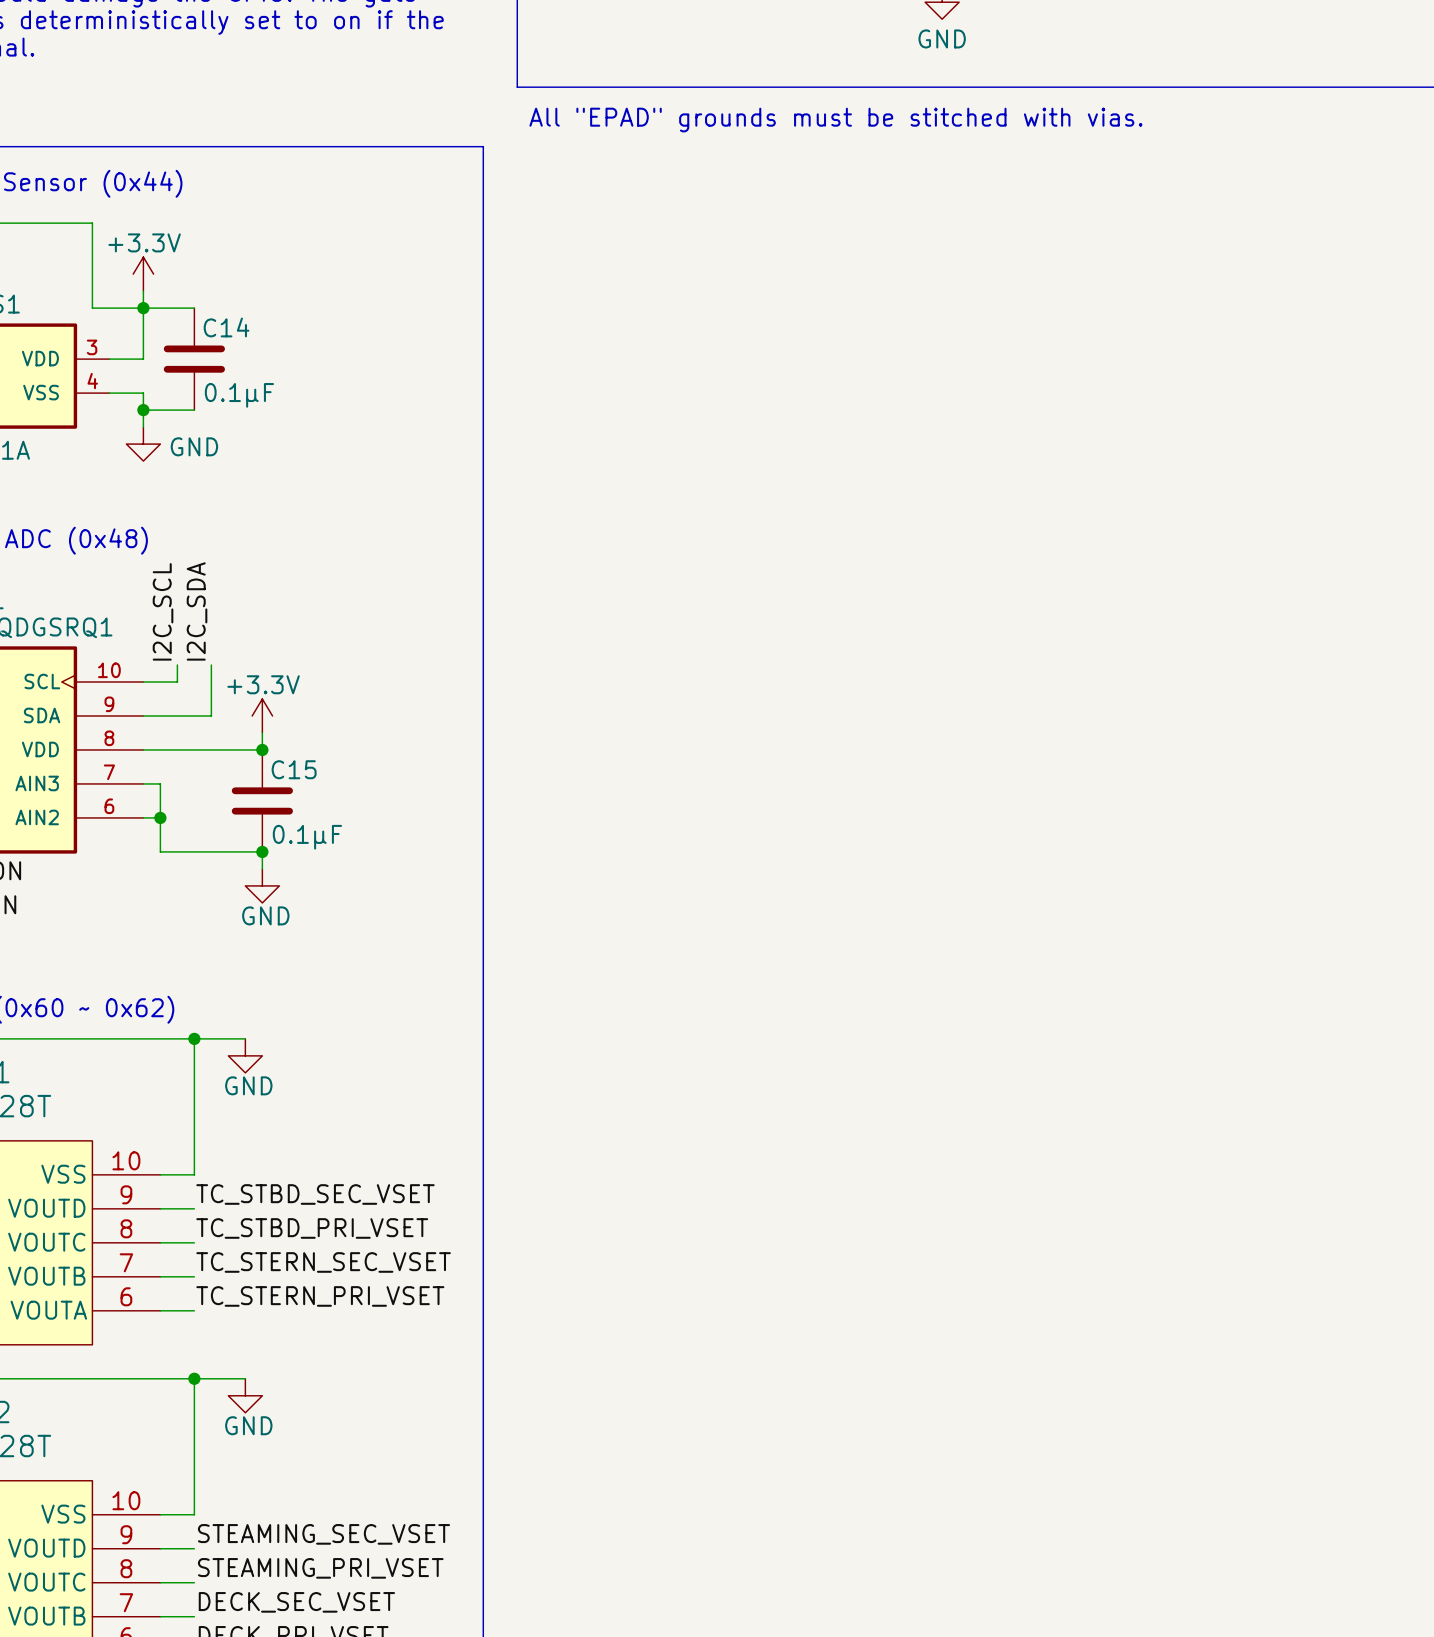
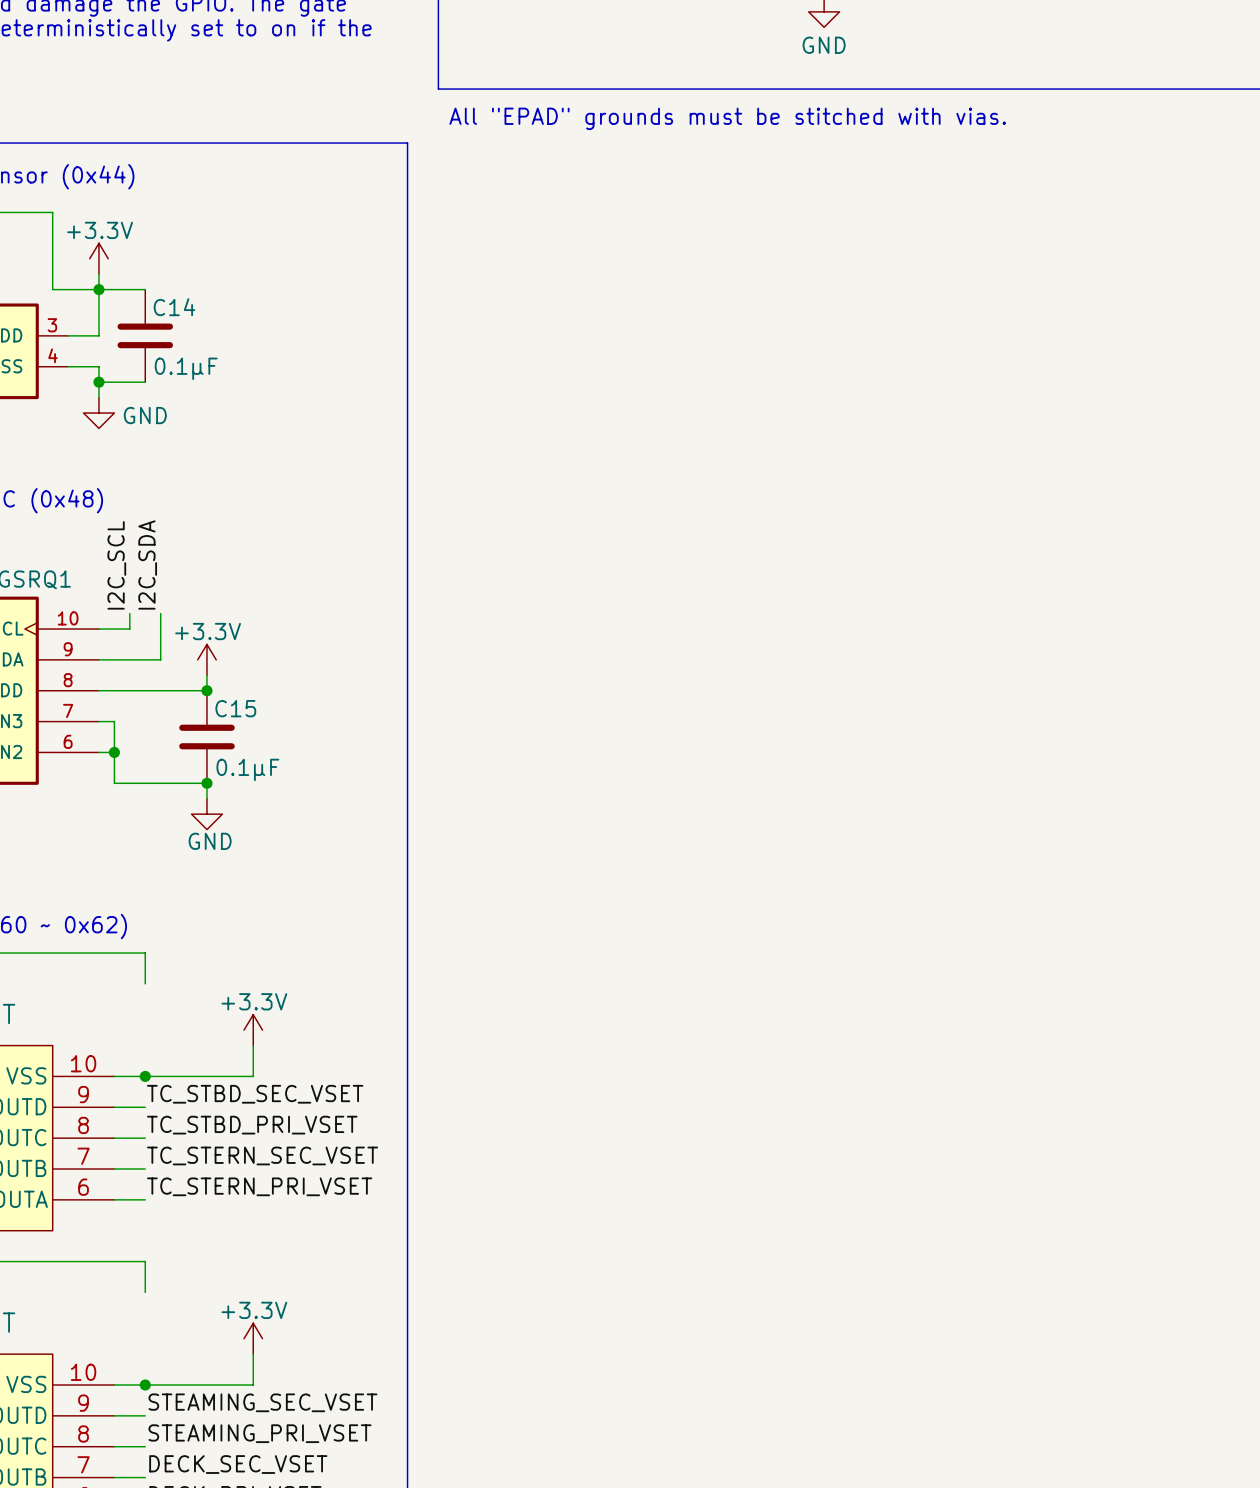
wire: (194, 1038) (245, 1038) -> none
junction: (194, 1038) -> none
power symbol: GND (245, 1055) -> none
wire: (194, 1072) (194, 1174) -> (253, 1045) (253, 1076) (145, 1076)
power symbol: none -> +3.3V (253, 1030)
junction: none -> (145, 1076)
wire: (194, 1378) (245, 1378) -> none
junction: (194, 1378) -> none
power symbol: GND (245, 1395) -> none
wire: (194, 1412) (194, 1514) -> (253, 1354) (253, 1385) (145, 1385)
power symbol: none -> +3.3V (253, 1338)
junction: none -> (145, 1385)

